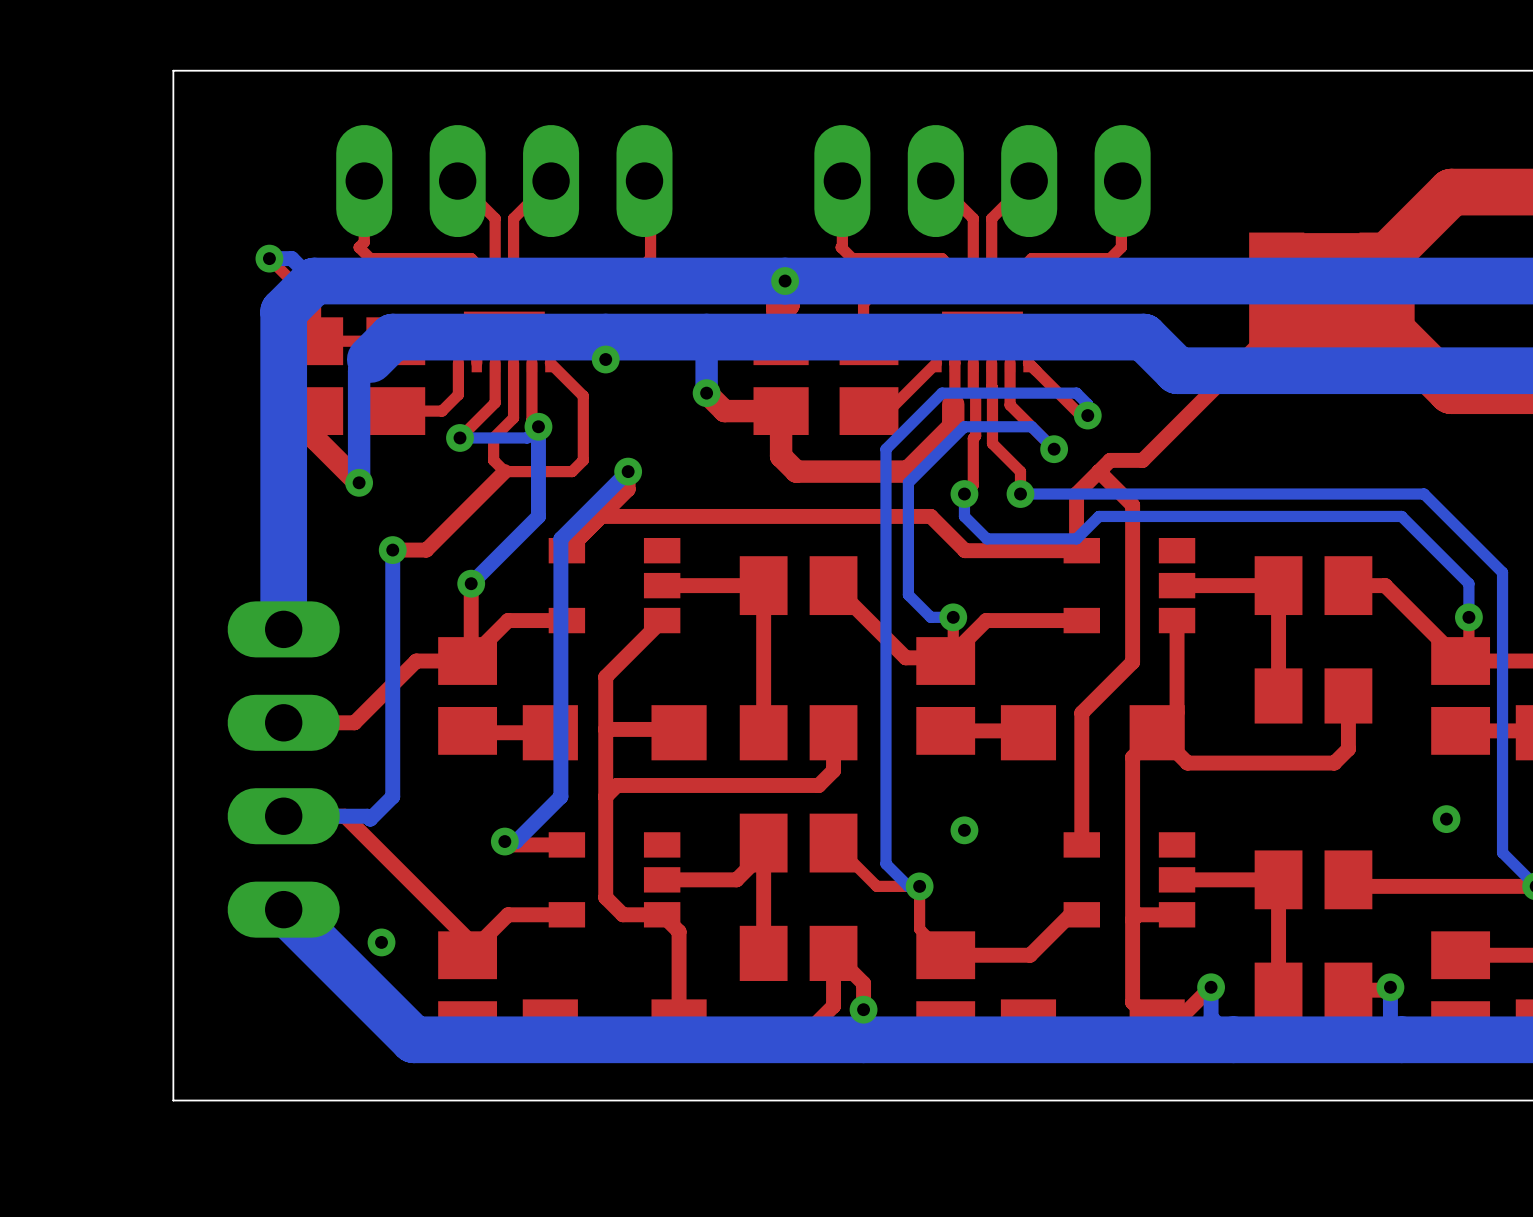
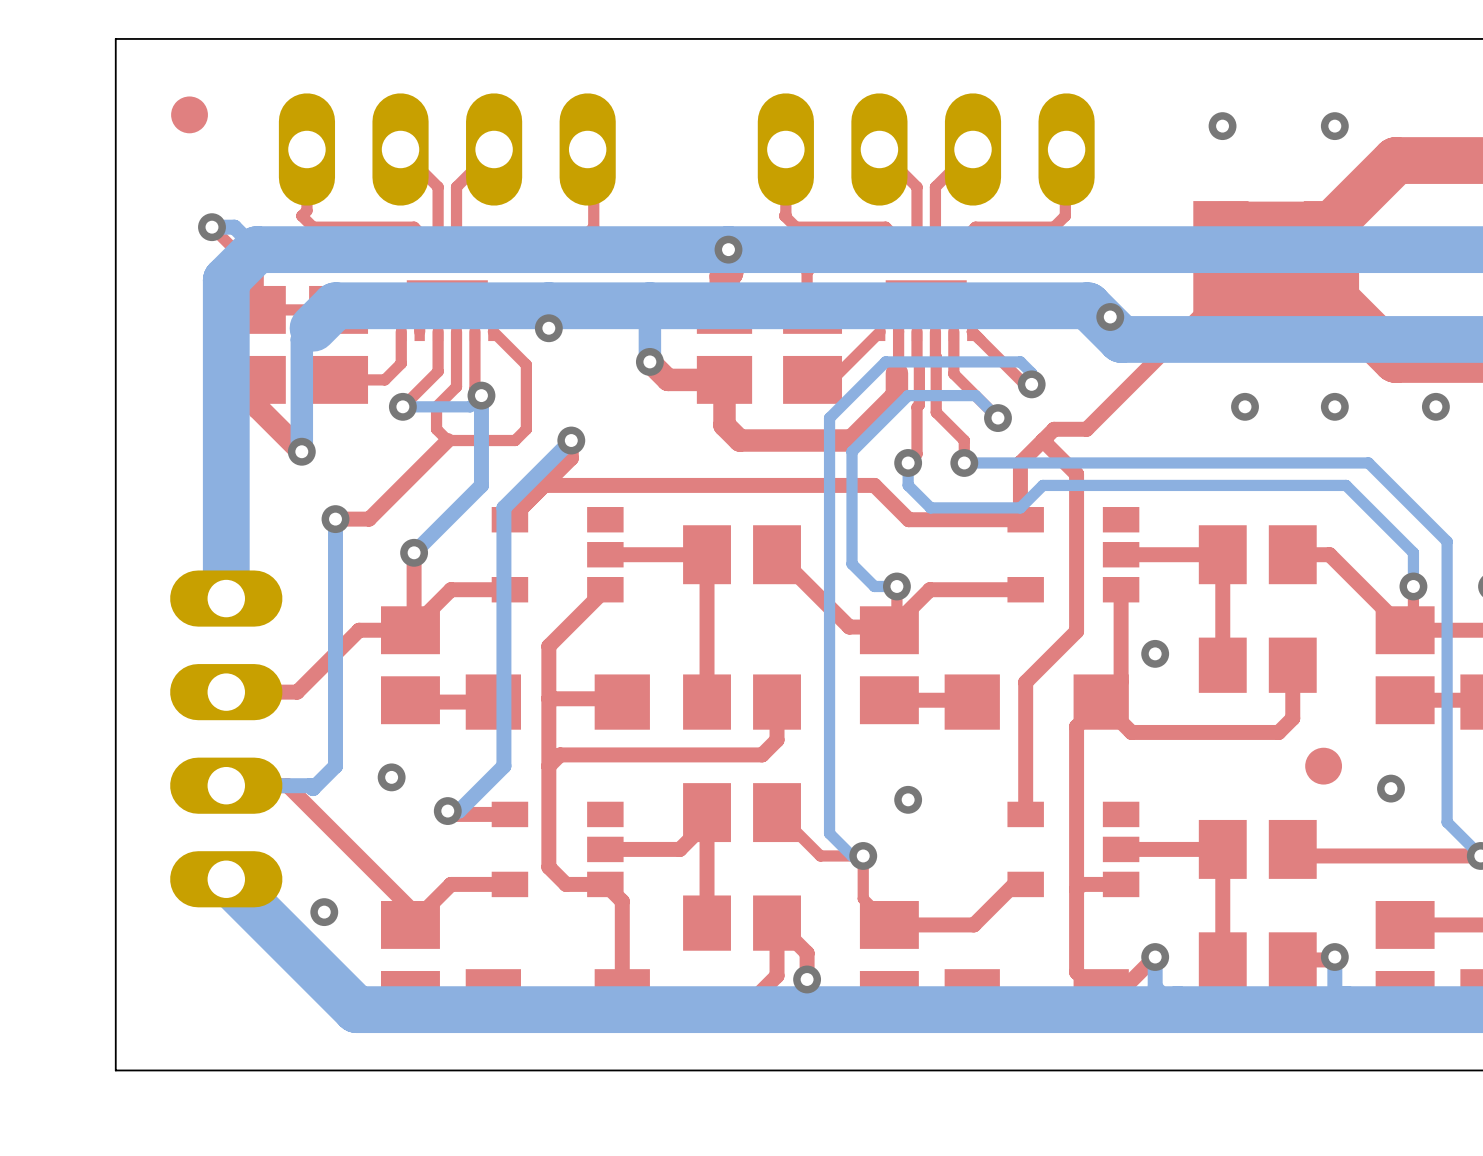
part: none -> (189, 114)
via: none -> (1222, 126)
via: none -> (1334, 126)
via: none -> (1110, 317)
via: none -> (1245, 406)
via: none -> (1334, 406)
via: none -> (1435, 406)
via: none -> (1155, 653)
part: none -> (1323, 766)
via: none -> (391, 777)

